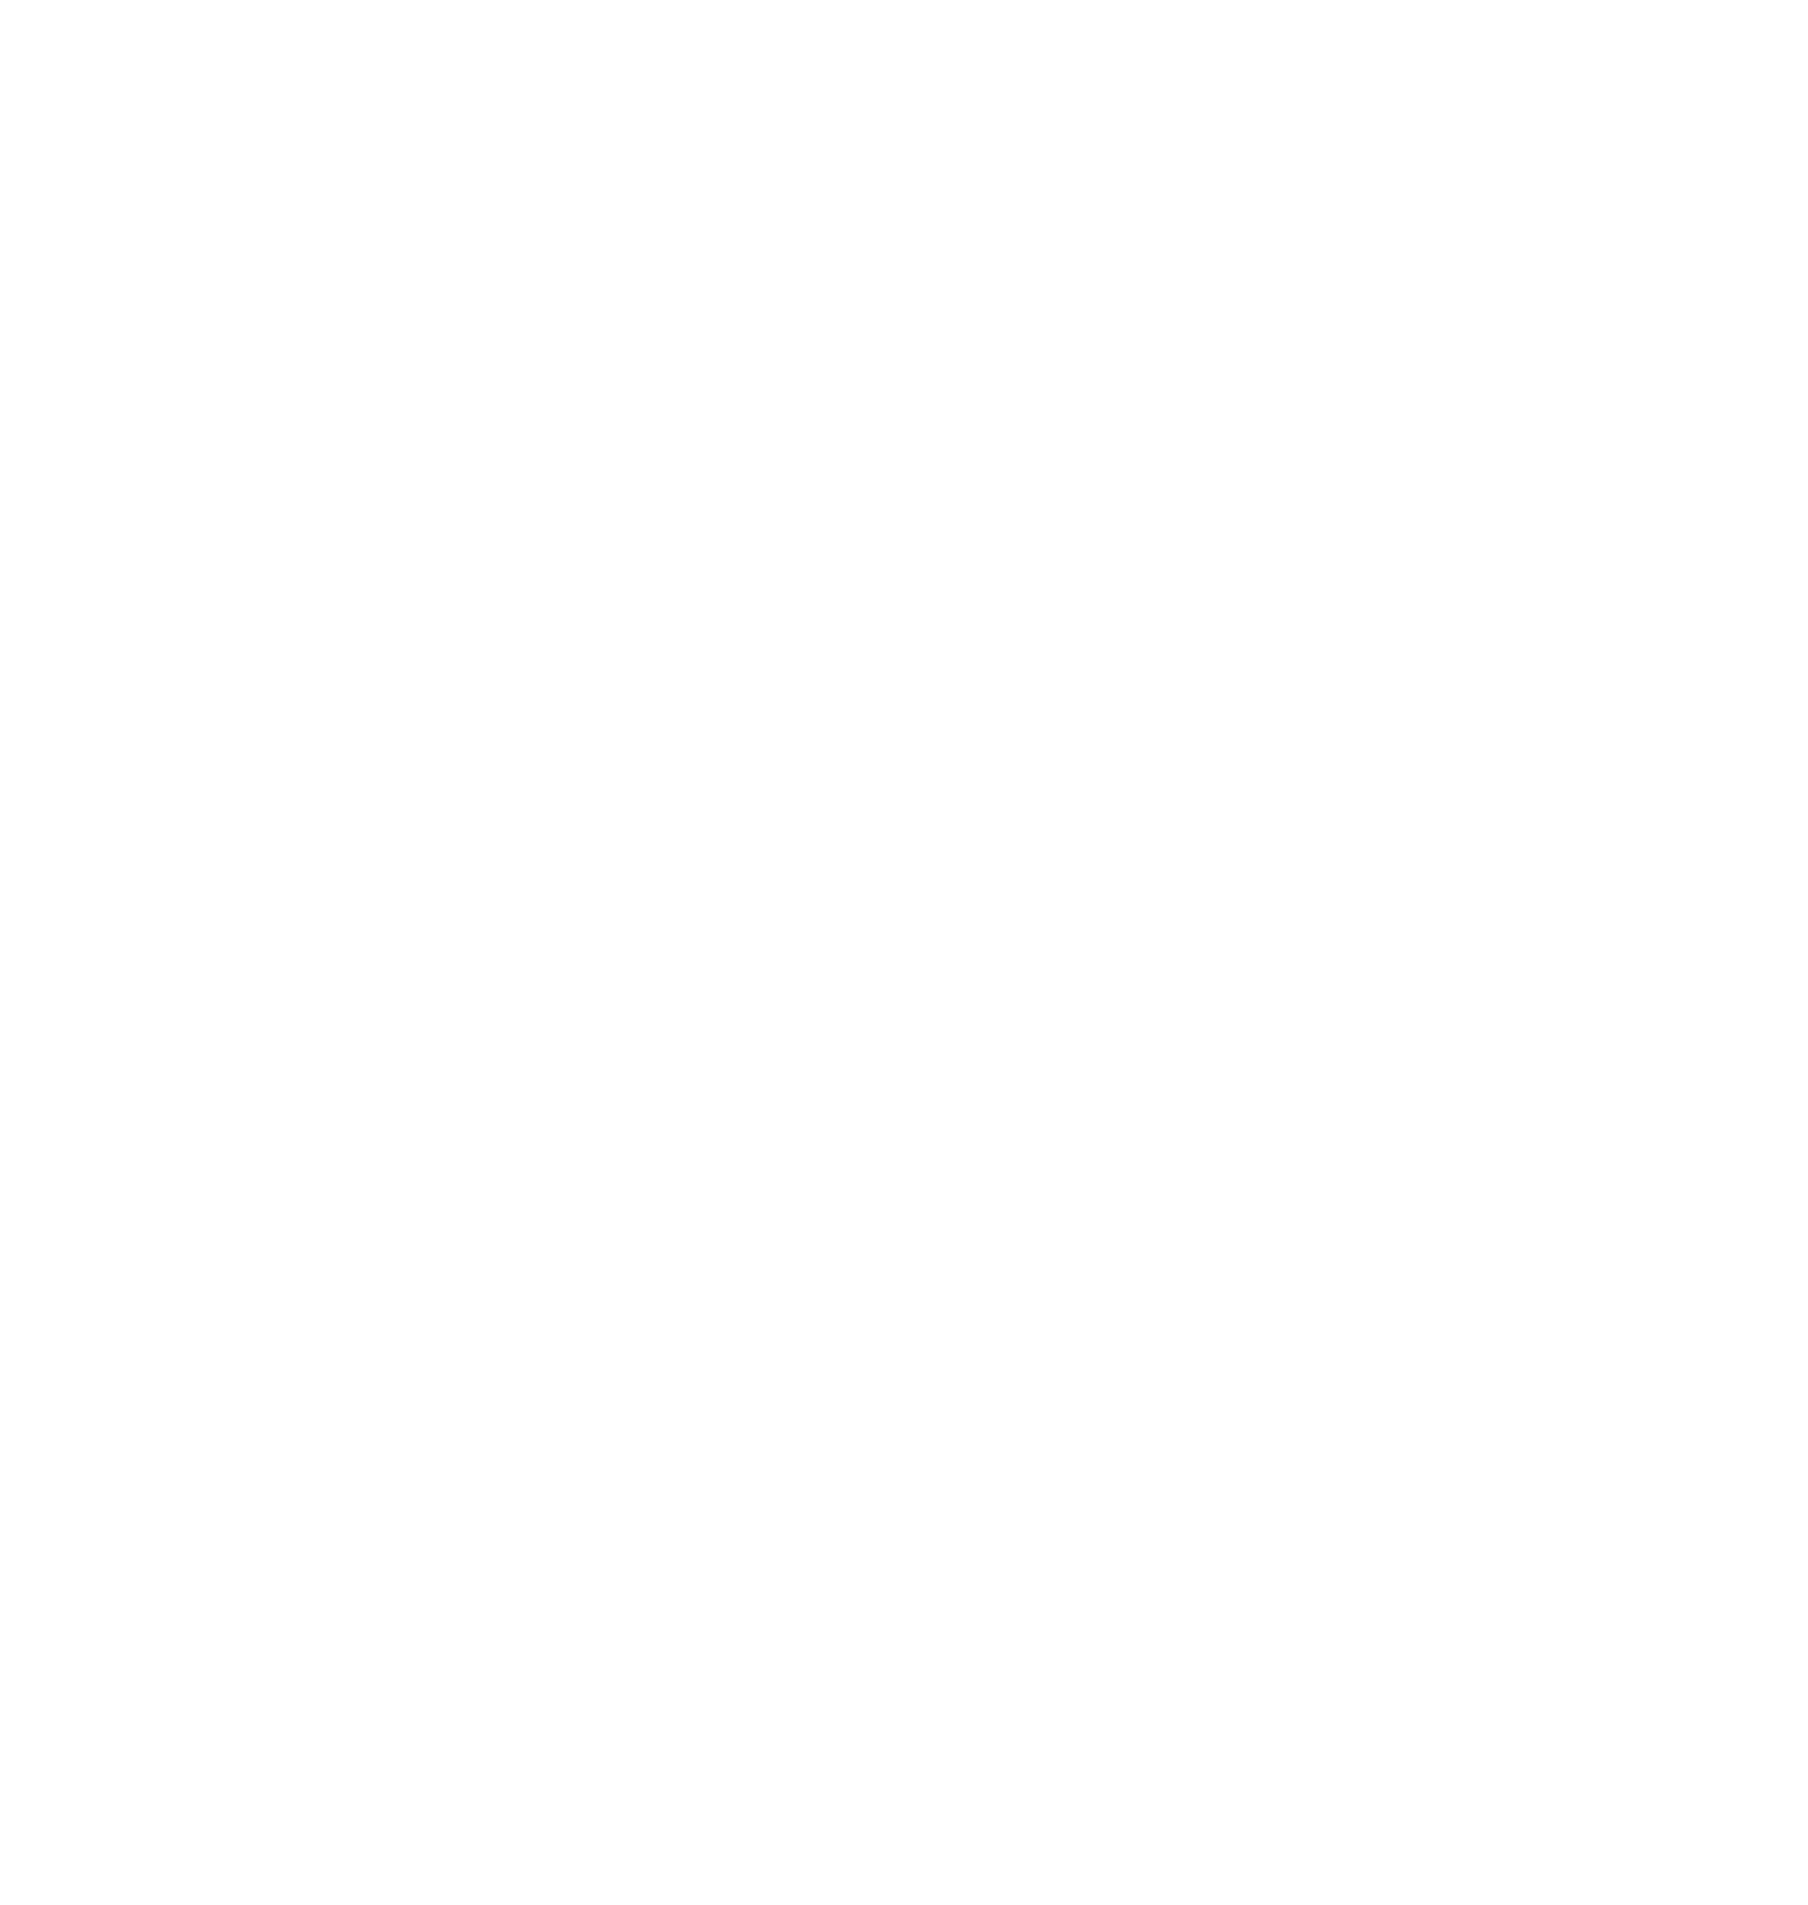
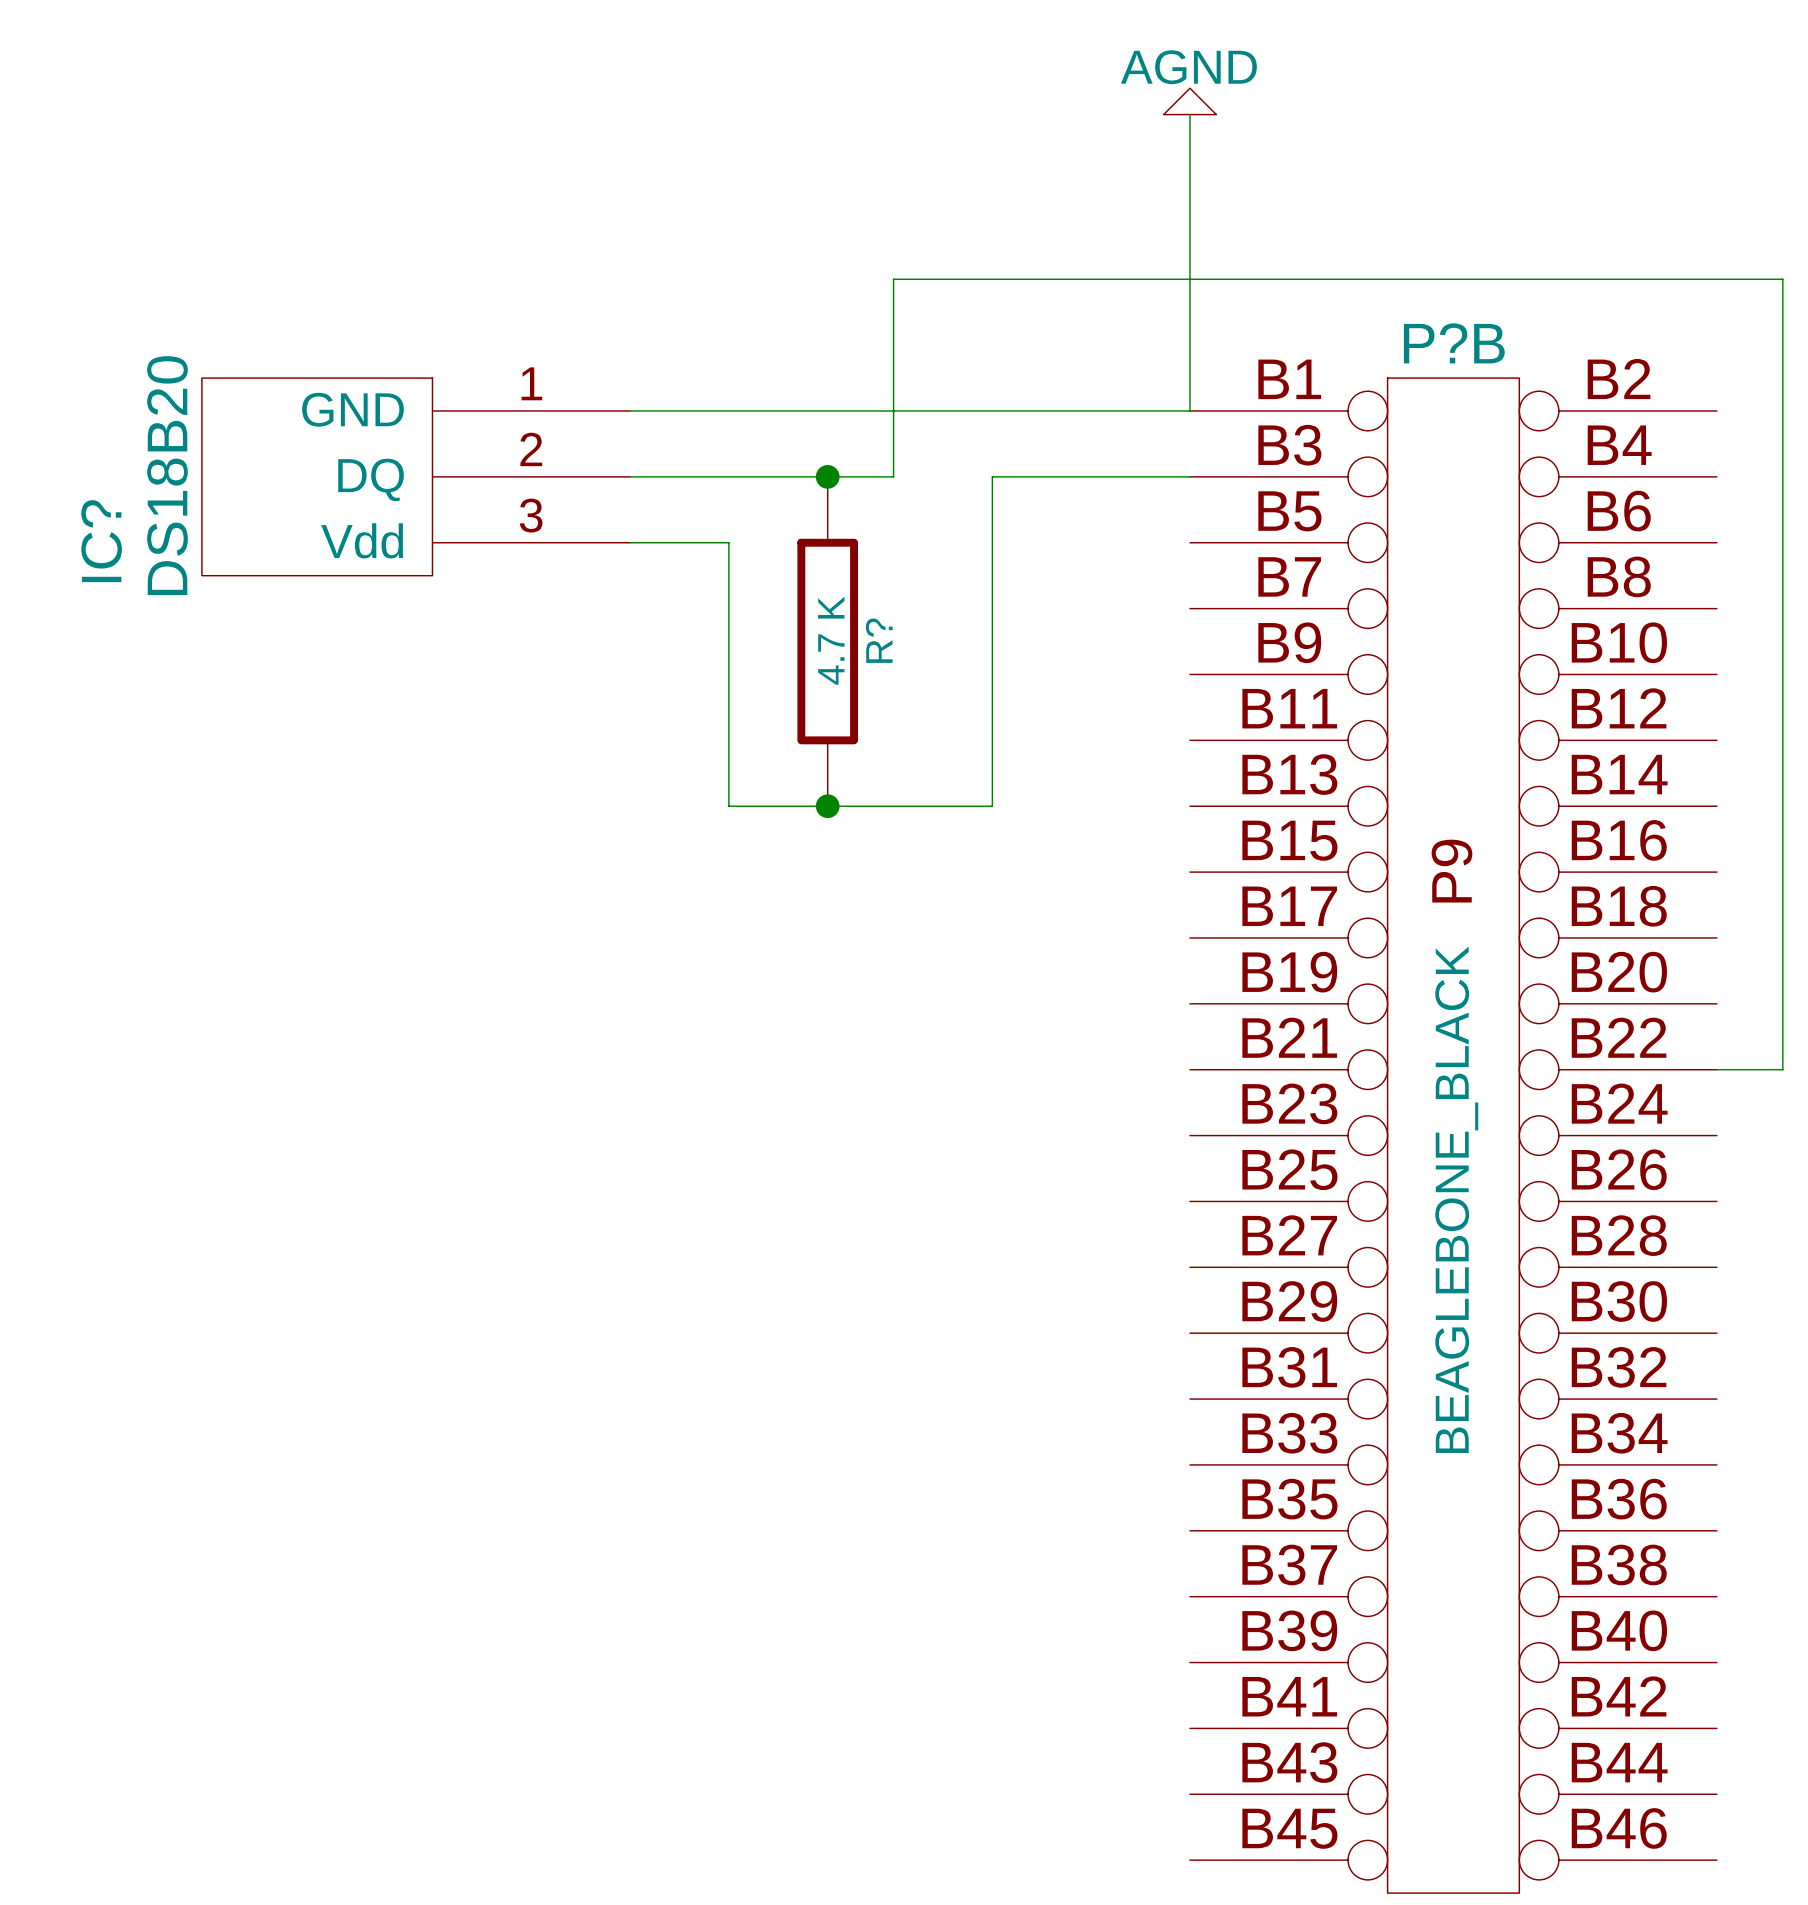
power symbol: none -> AGND (1189, 101)
wire: none -> (1189, 114) (1189, 411) (630, 411)
IC?: none -> DS18B20 (416, 476)
wire: none -> (630, 476) (893, 476) (893, 279) (1782, 279) (1782, 1069) (1716, 1069)
junction: none -> (827, 476)
wire: none -> (1189, 476) (992, 476) (992, 806) (728, 806) (728, 542) (630, 542)
R?: none -> 4.7 K (827, 641)
junction: none -> (827, 806)
P?B: none -> BEAGLEBONE_BLACK (1453, 1135)

